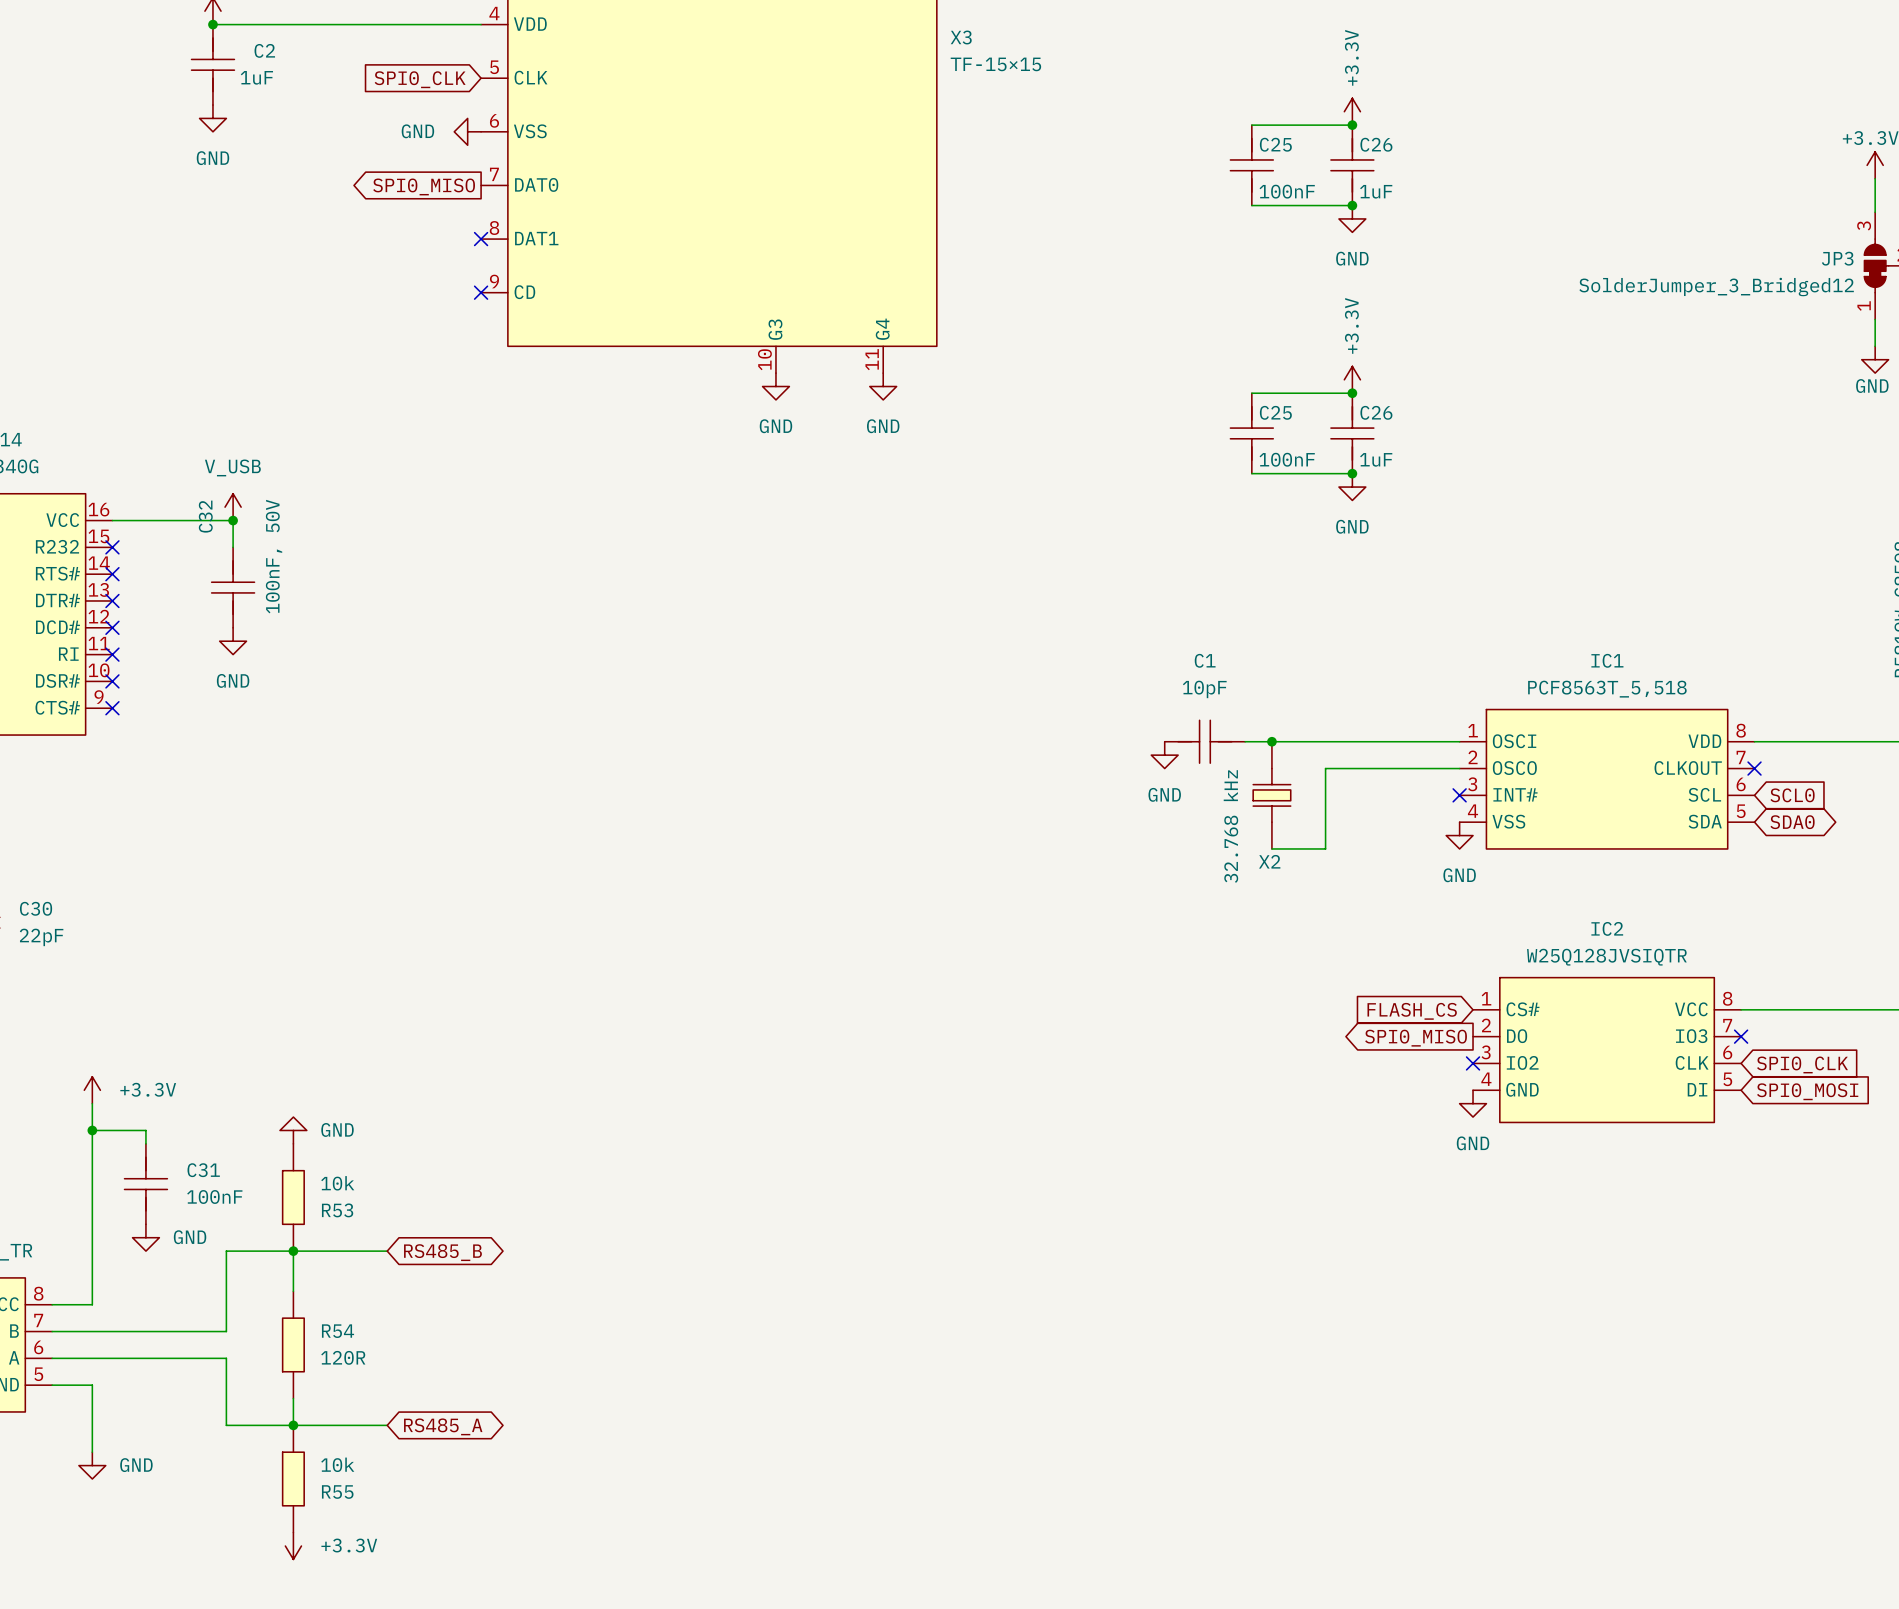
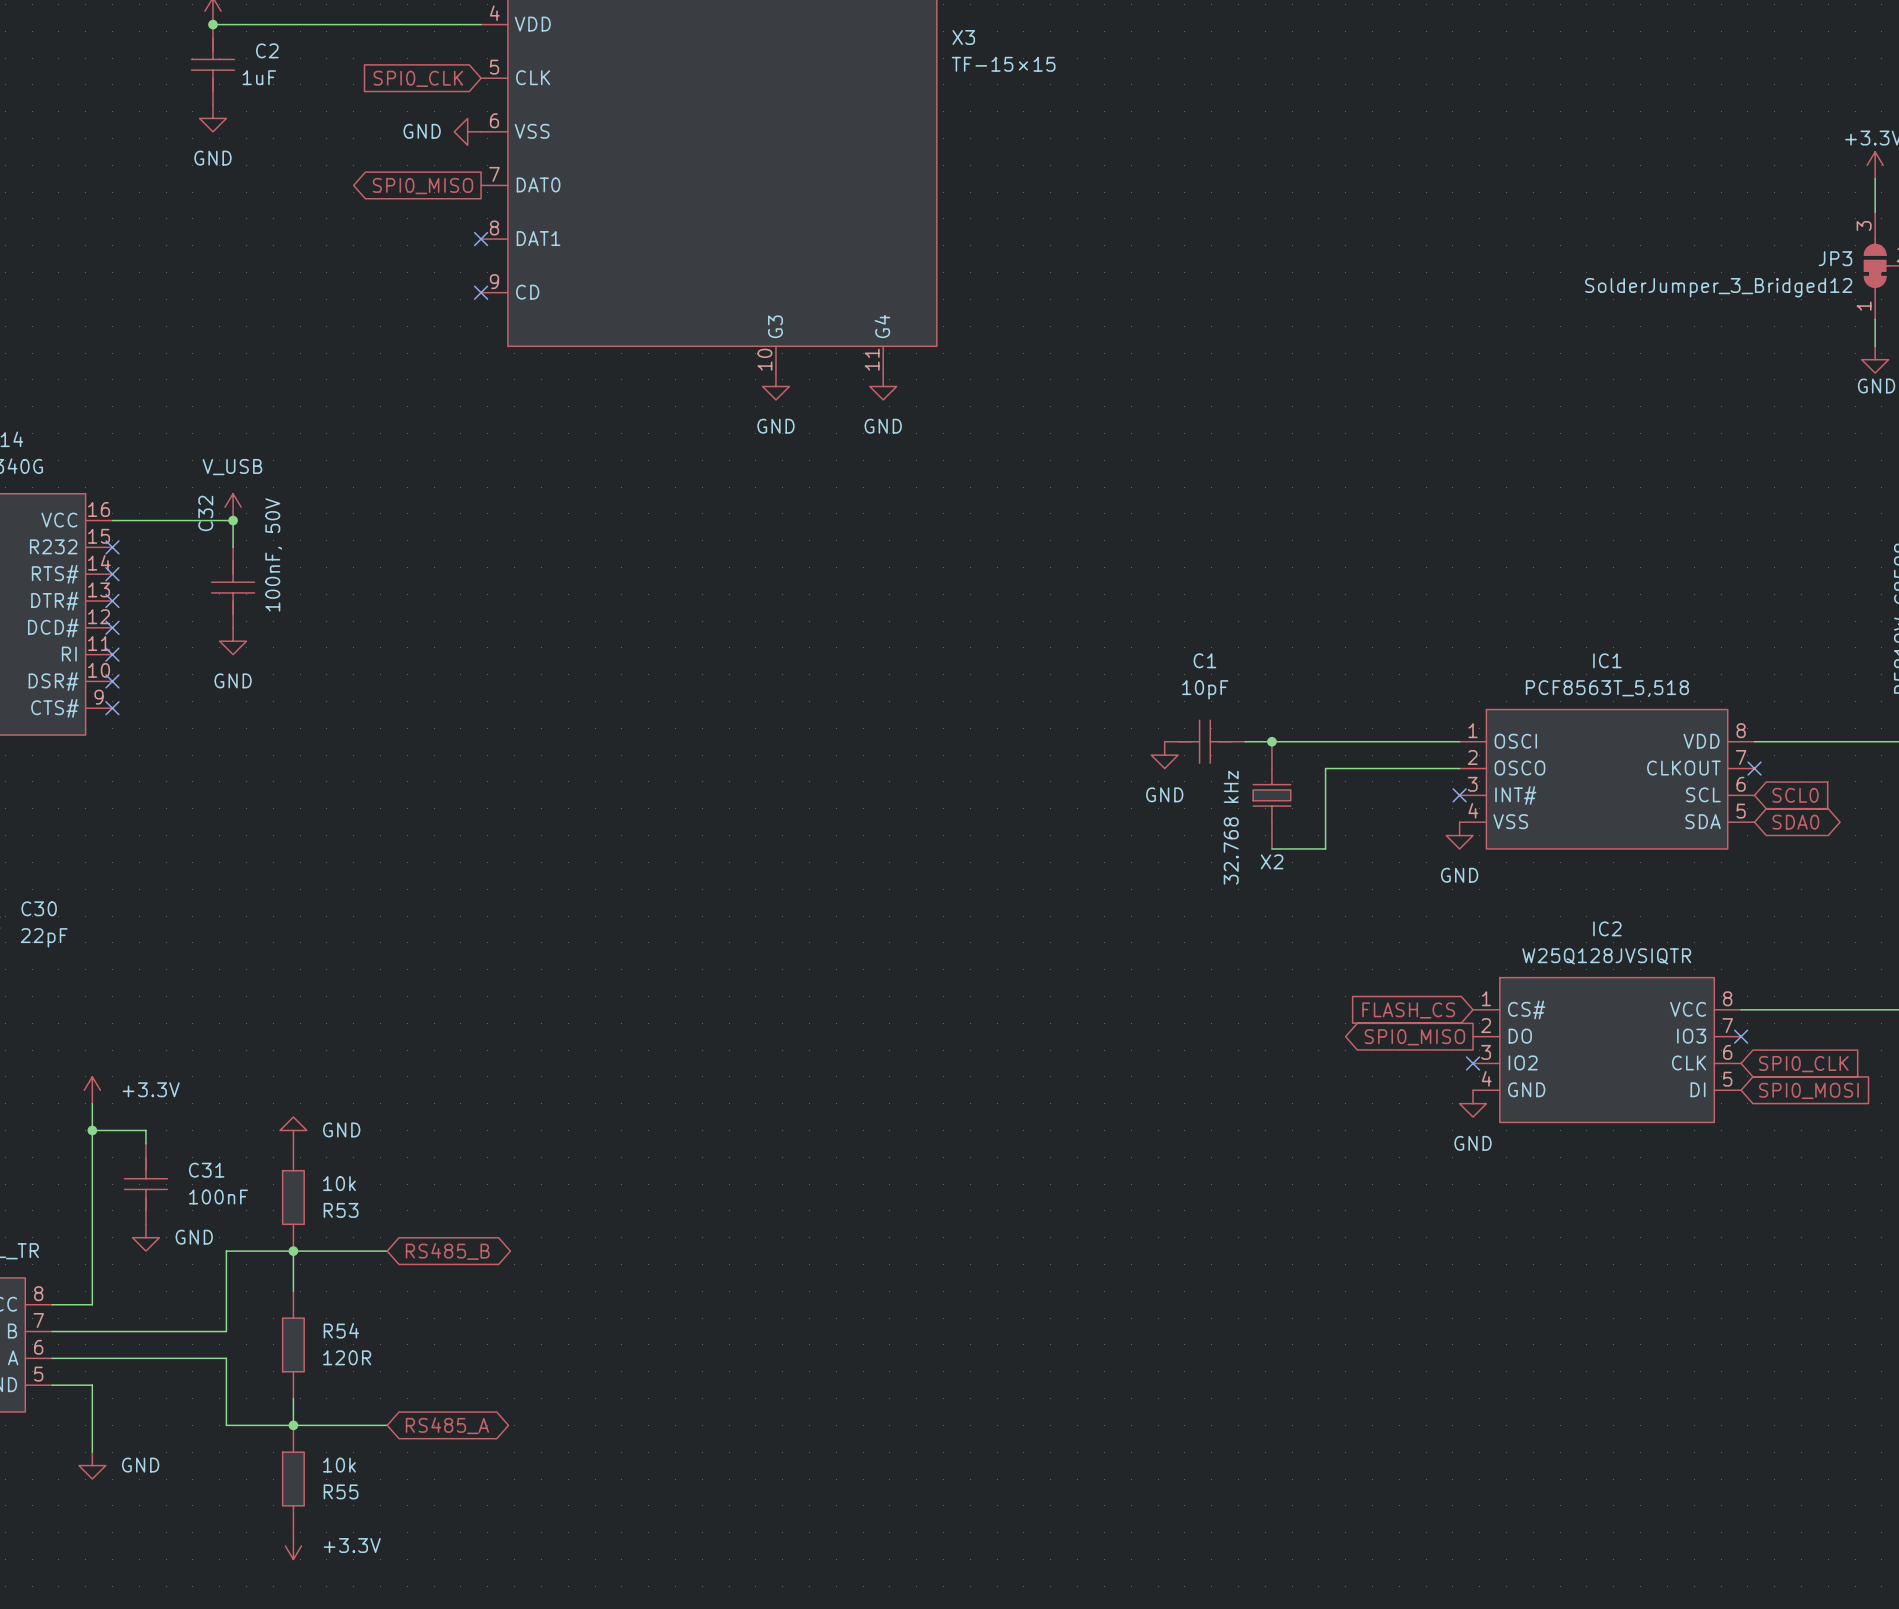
power symbol: +3.3V (1352, 111) -> none
wire: (1251, 125) (1352, 125) -> none
junction: (1352, 125) -> none
C25: 100nF (1251, 165) -> none
C26: 1uF (1352, 165) -> none
wire: (1251, 205) (1352, 205) -> none
junction: (1352, 205) -> none
power symbol: GND (1352, 218) -> none
power symbol: +3.3V (1352, 379) -> none
wire: (1251, 393) (1352, 393) -> none
junction: (1352, 393) -> none
C25: 100nF (1251, 433) -> none
C26: 1uF (1352, 433) -> none
wire: (1251, 473) (1352, 473) -> none
junction: (1352, 473) -> none
power symbol: GND (1352, 487) -> none

